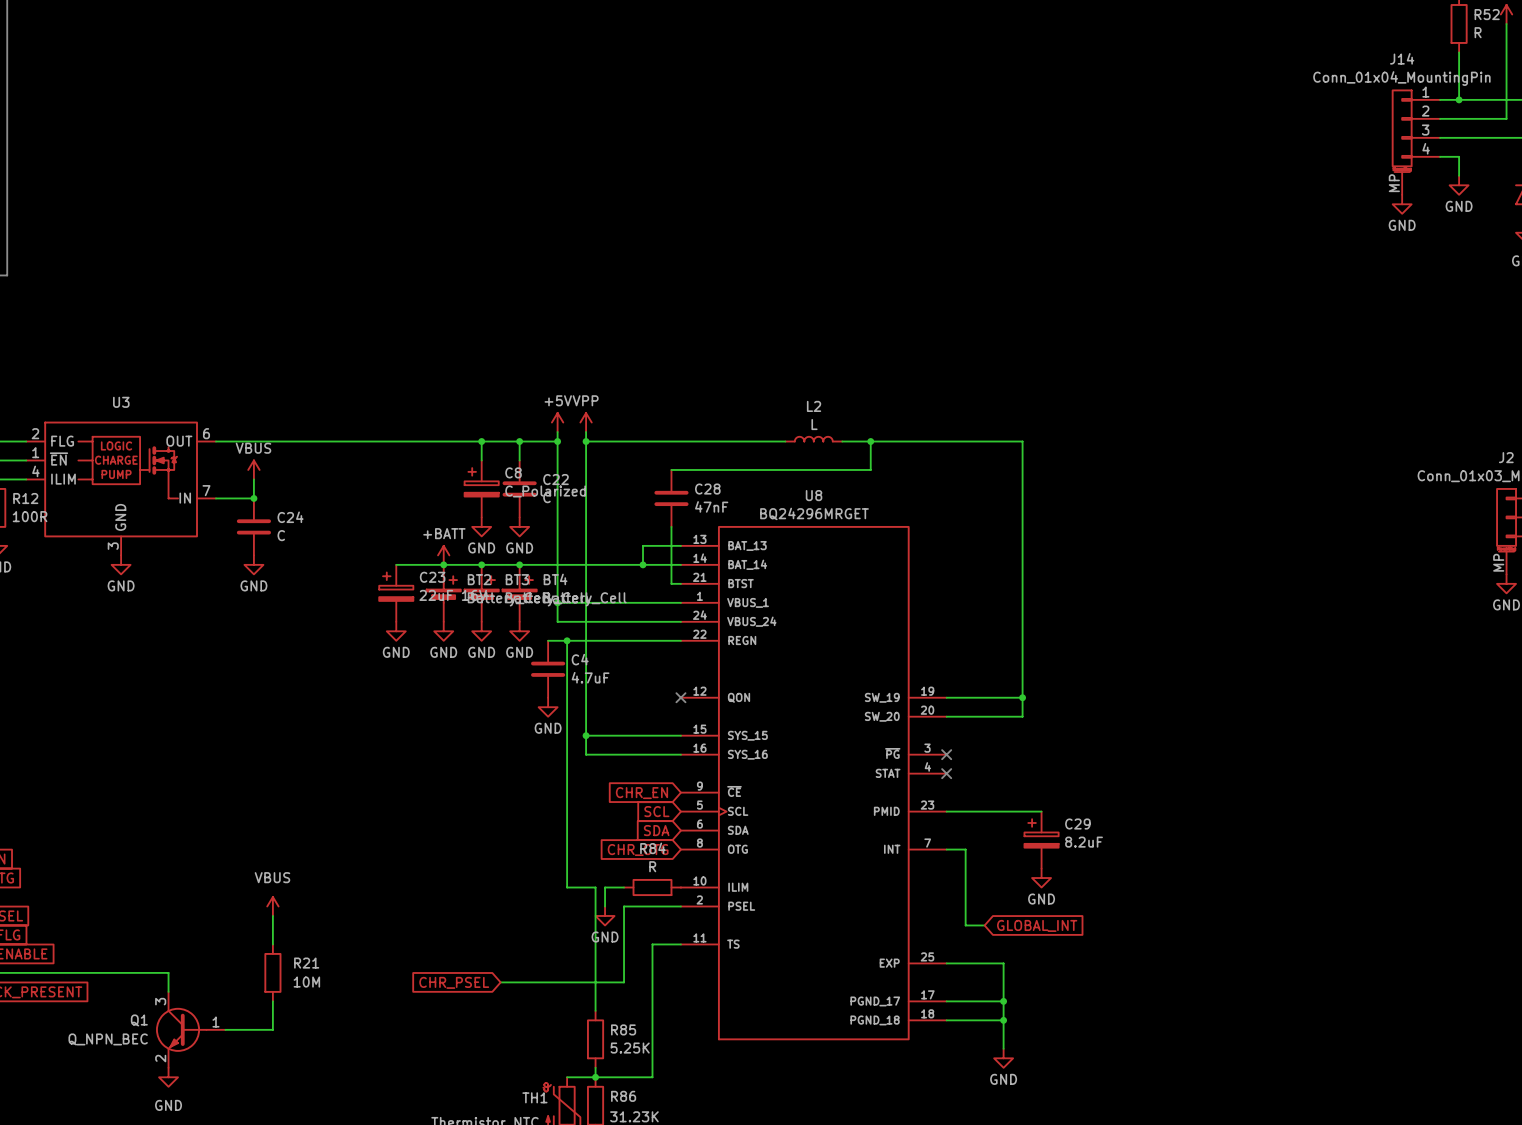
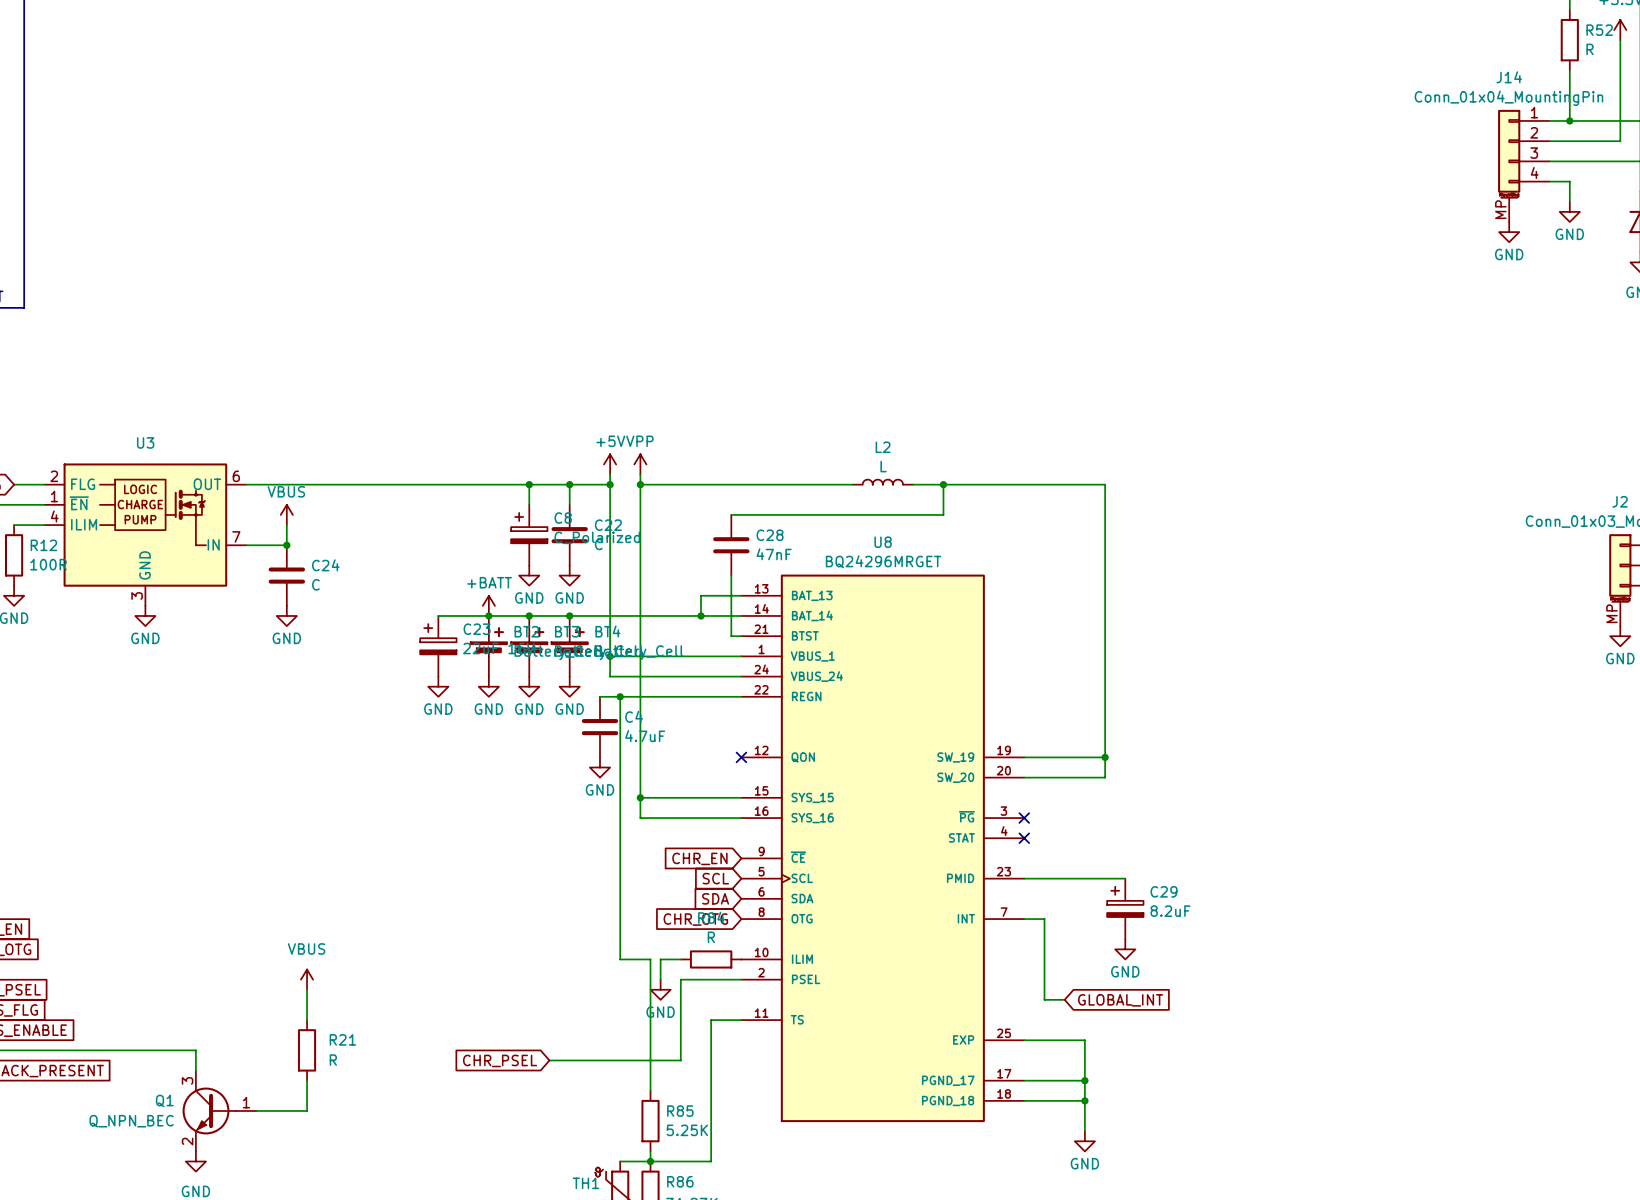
R21 value: 10M (306, 982) -> R (333, 1060)

